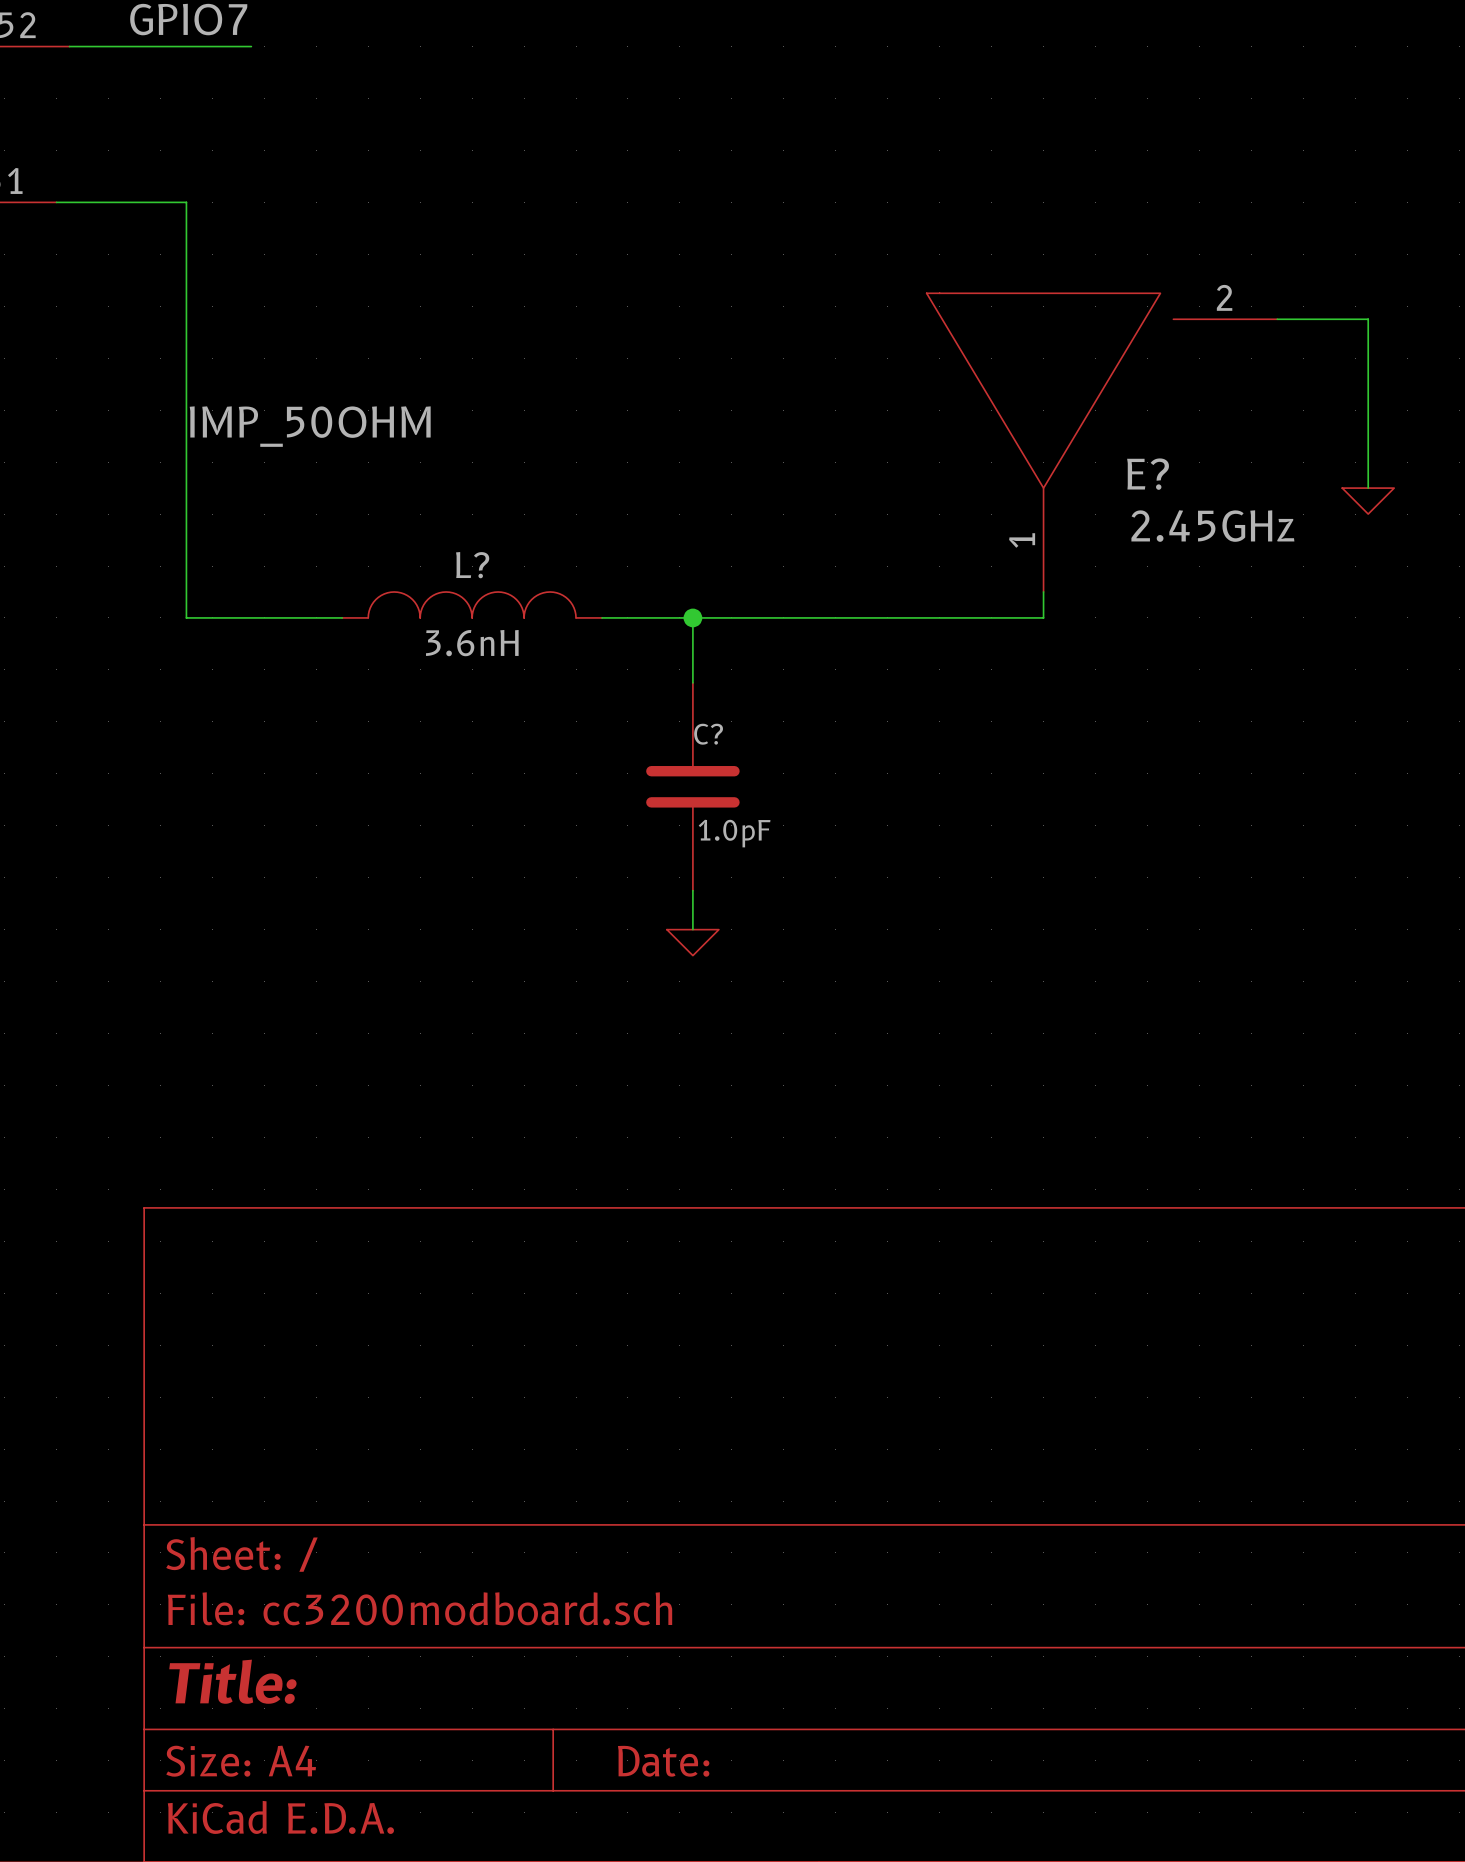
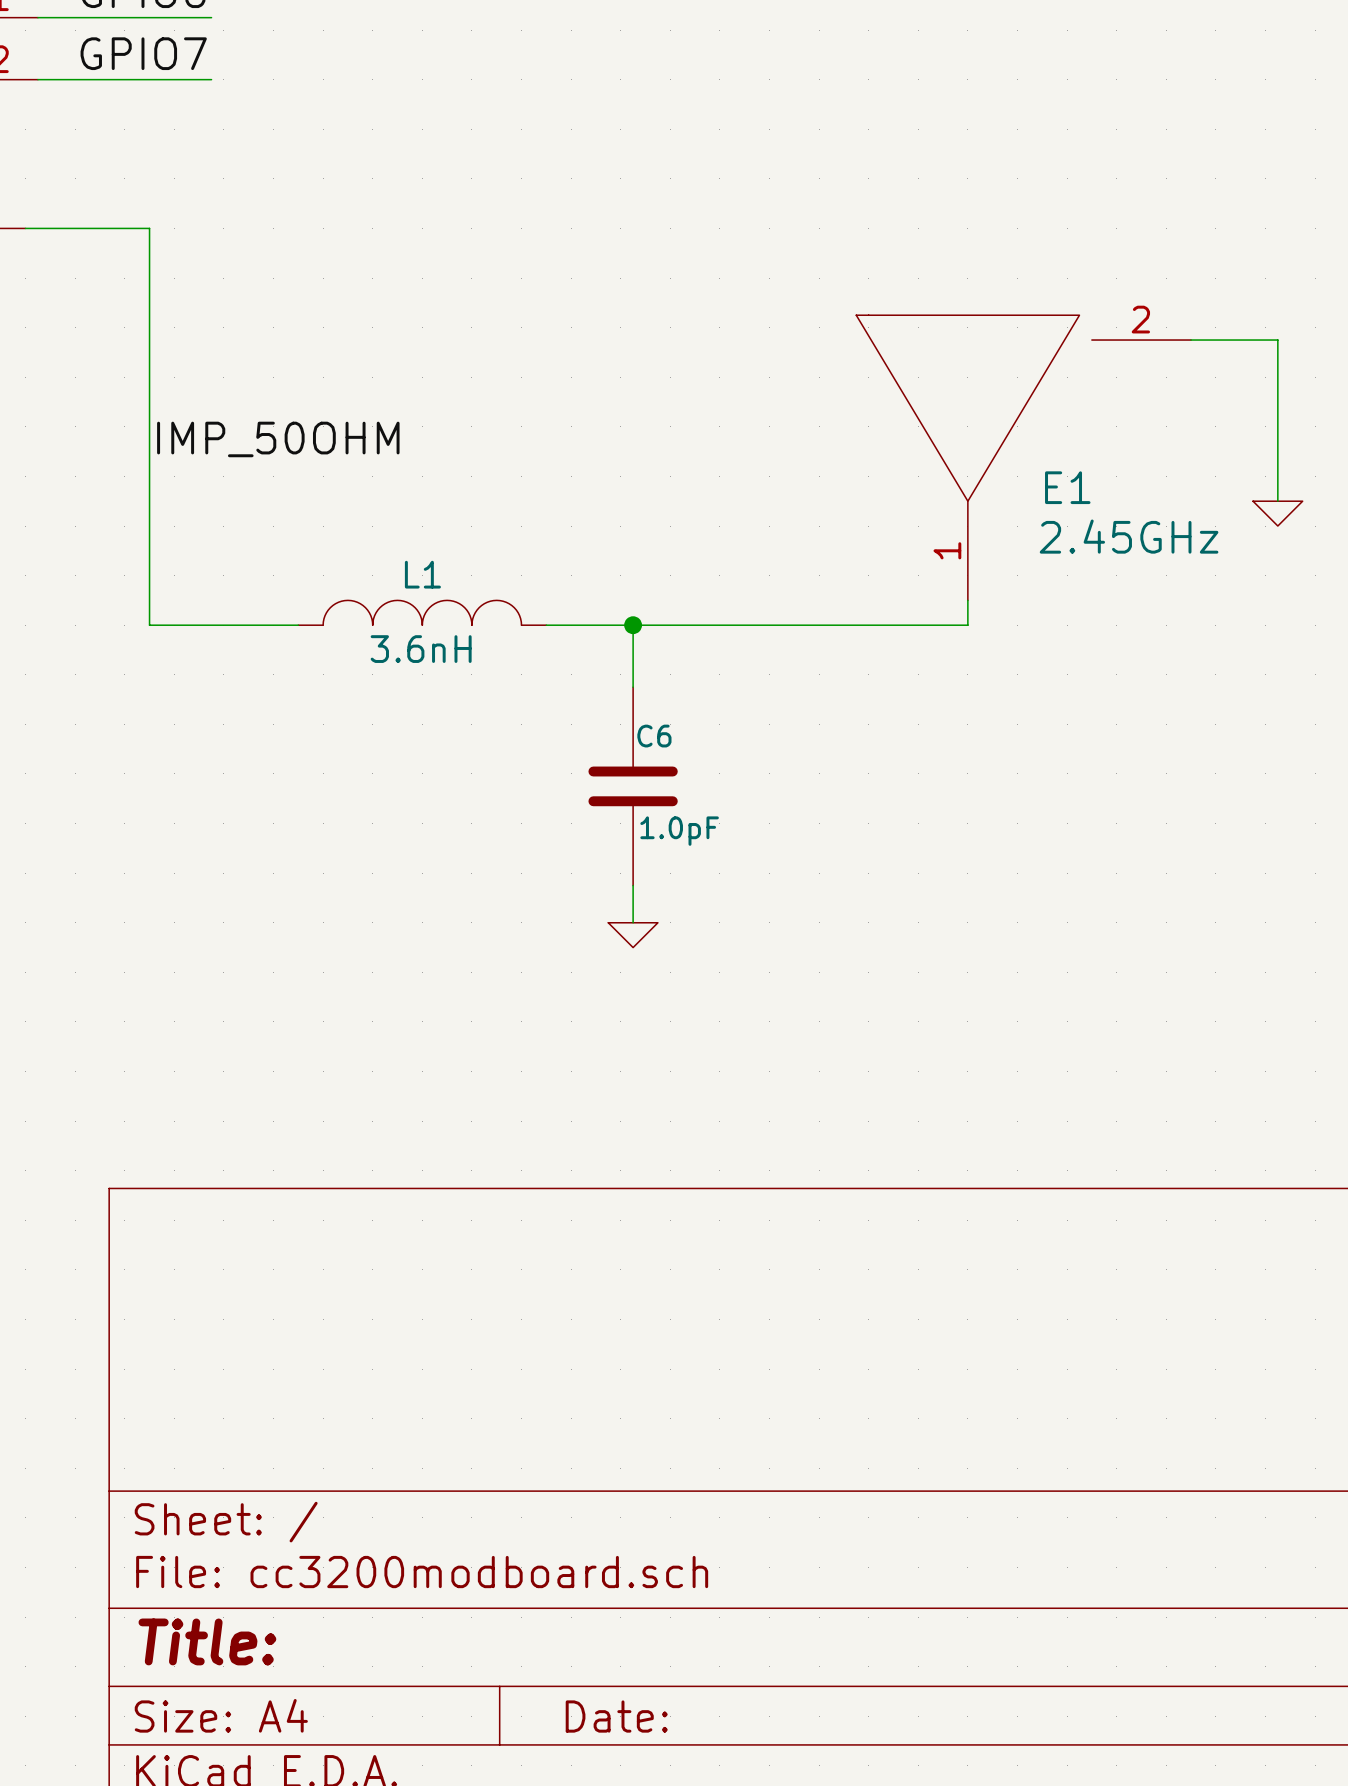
E? name: E? (1148, 474) -> E1 (1067, 487)
L? name: L? (472, 565) -> L1 (422, 574)
C? name: C? (708, 734) -> C6 (654, 736)

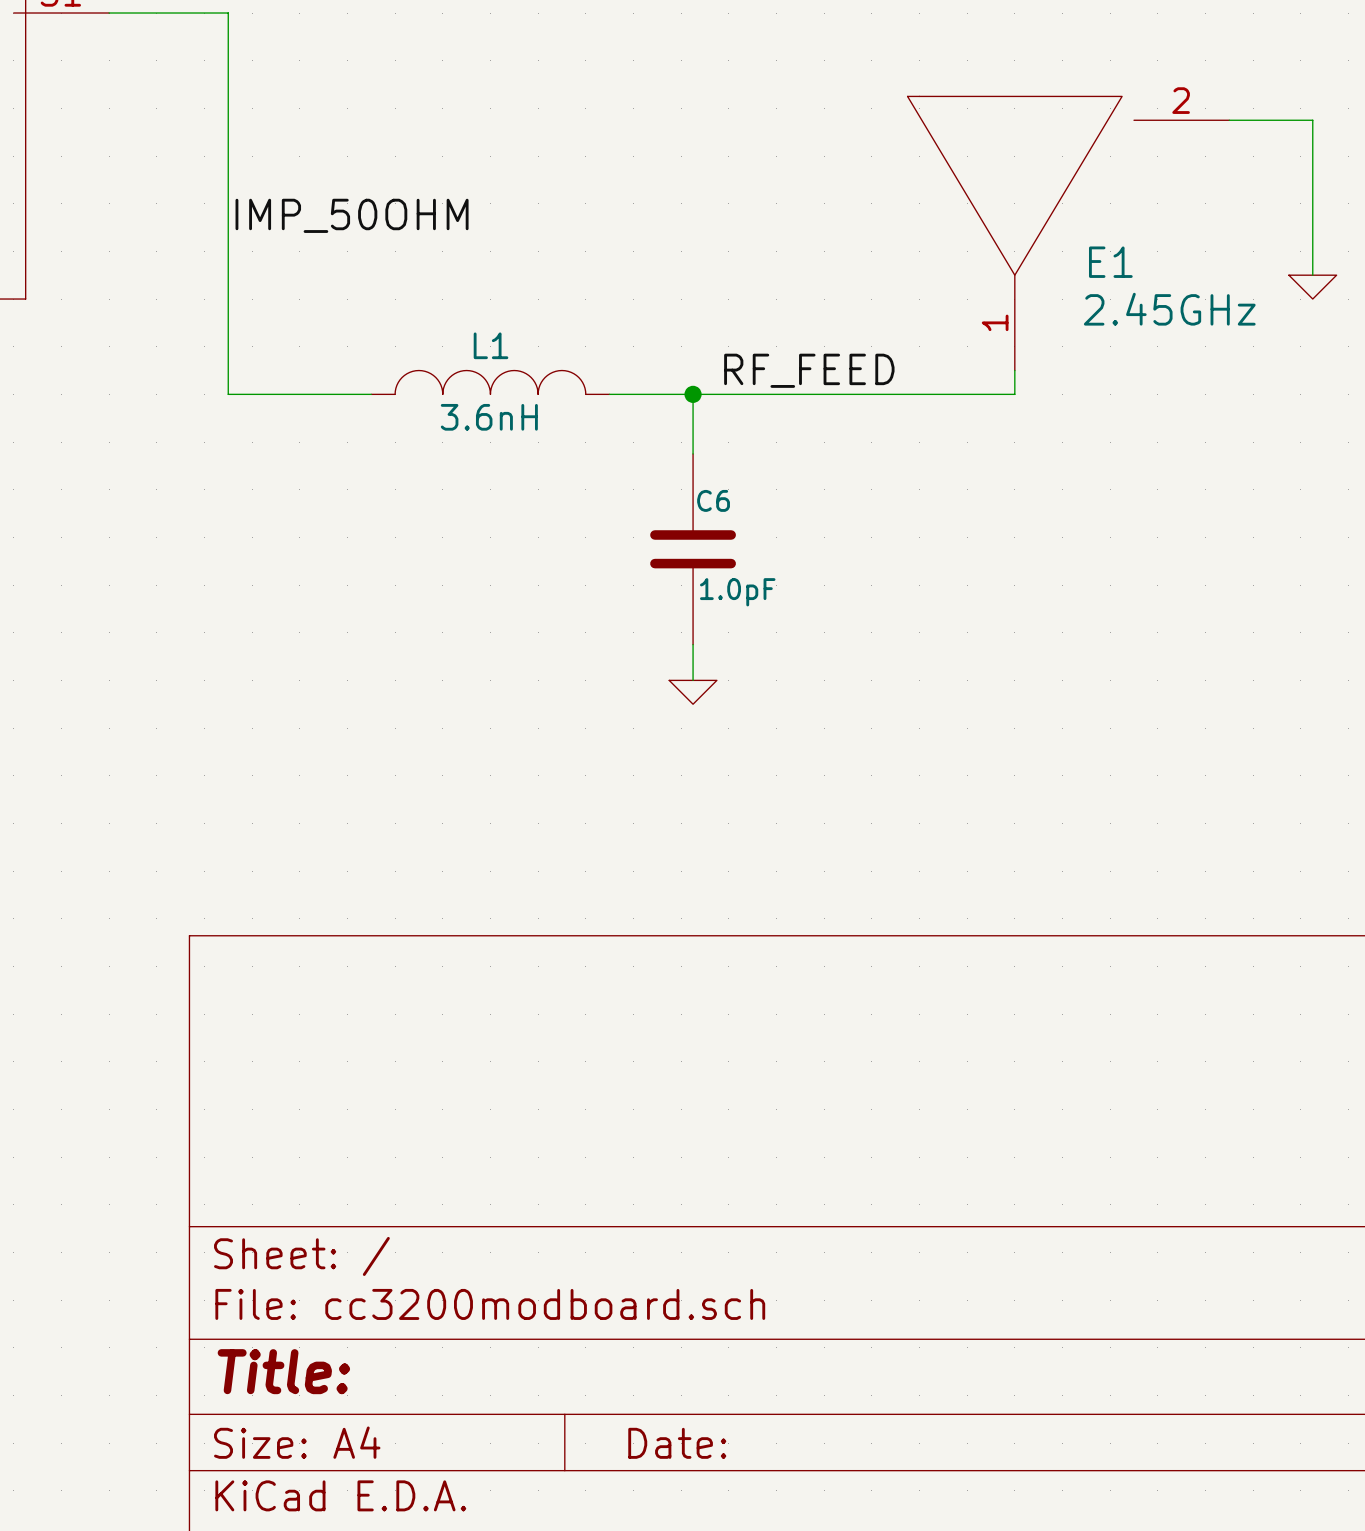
label: none -> RF_FEED (809, 370)

